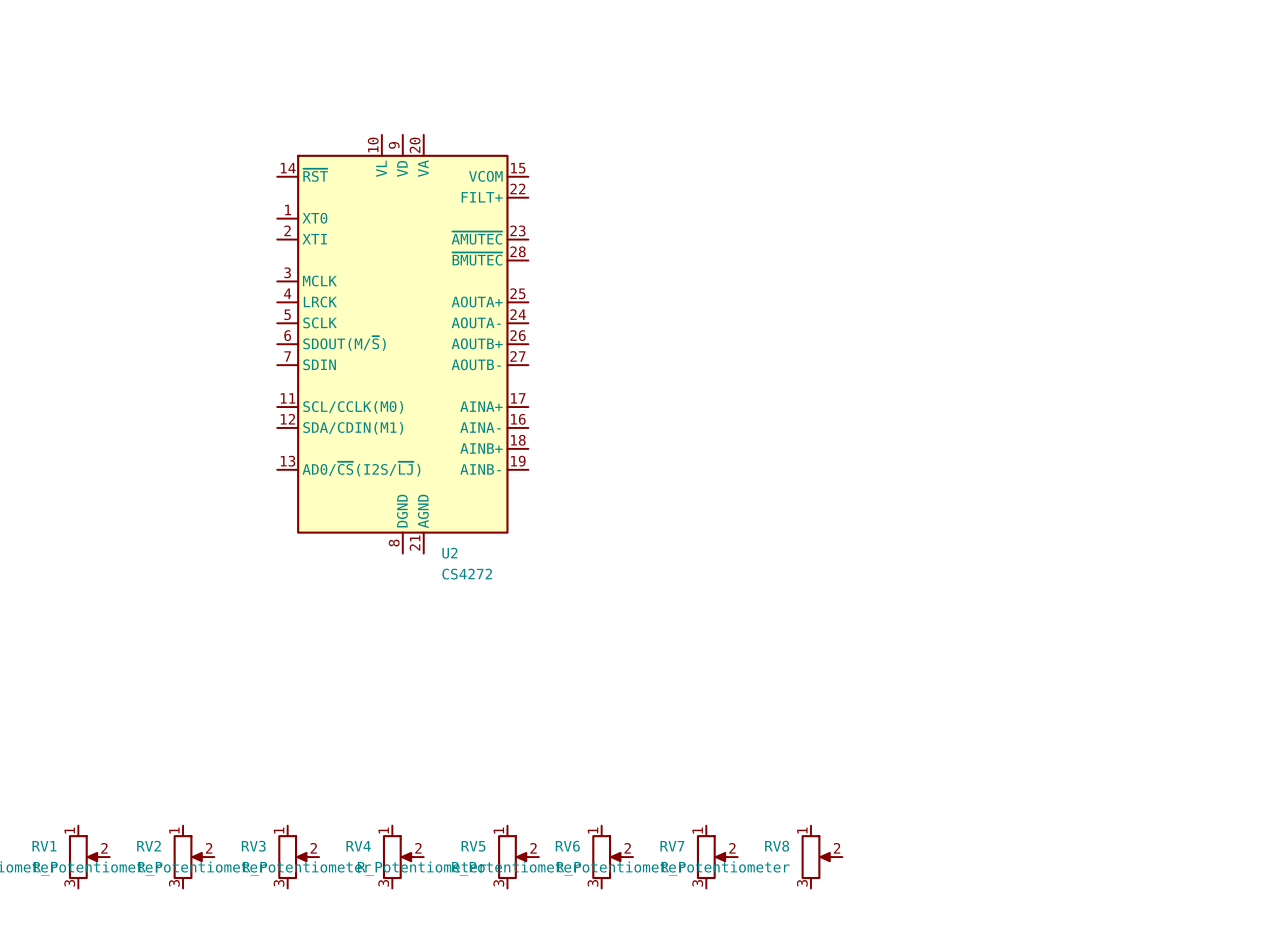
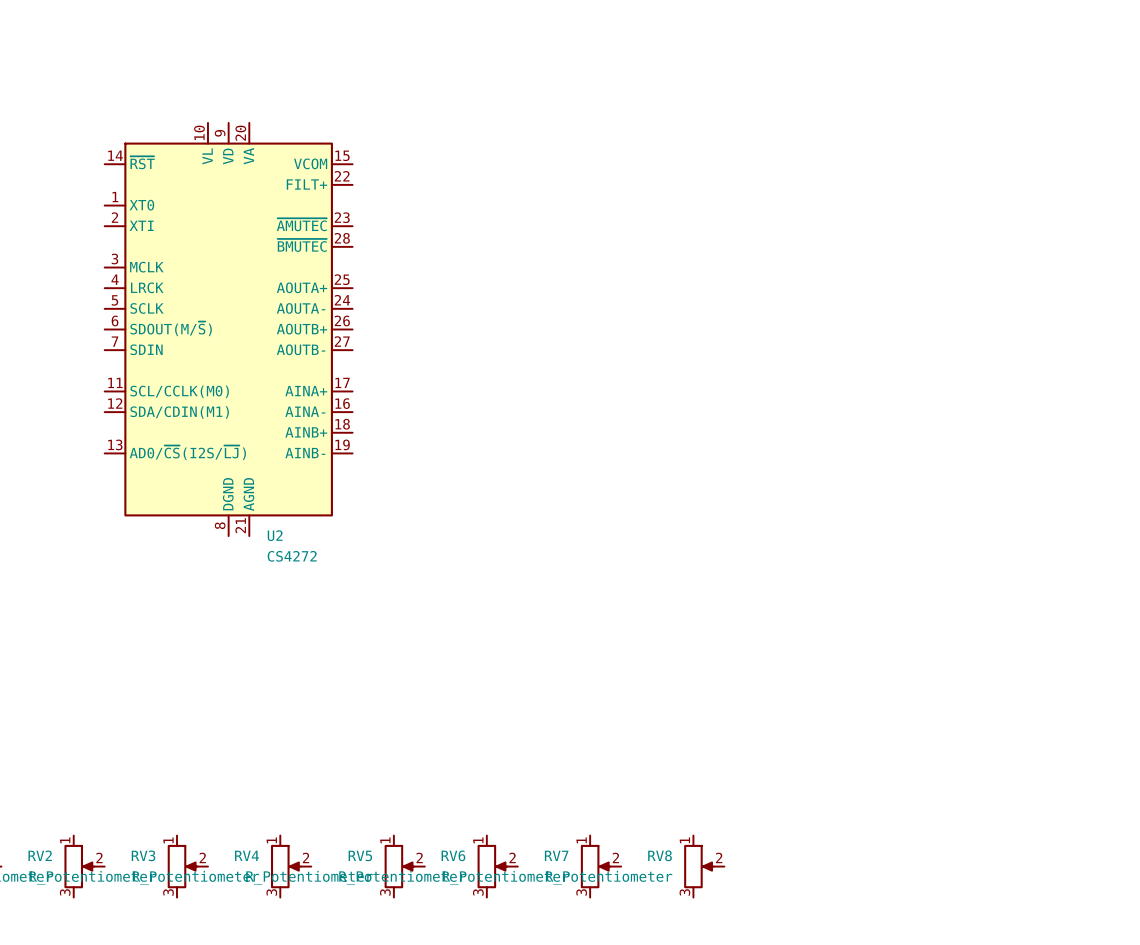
U2 position: (402, 344) -> (228, 329)

